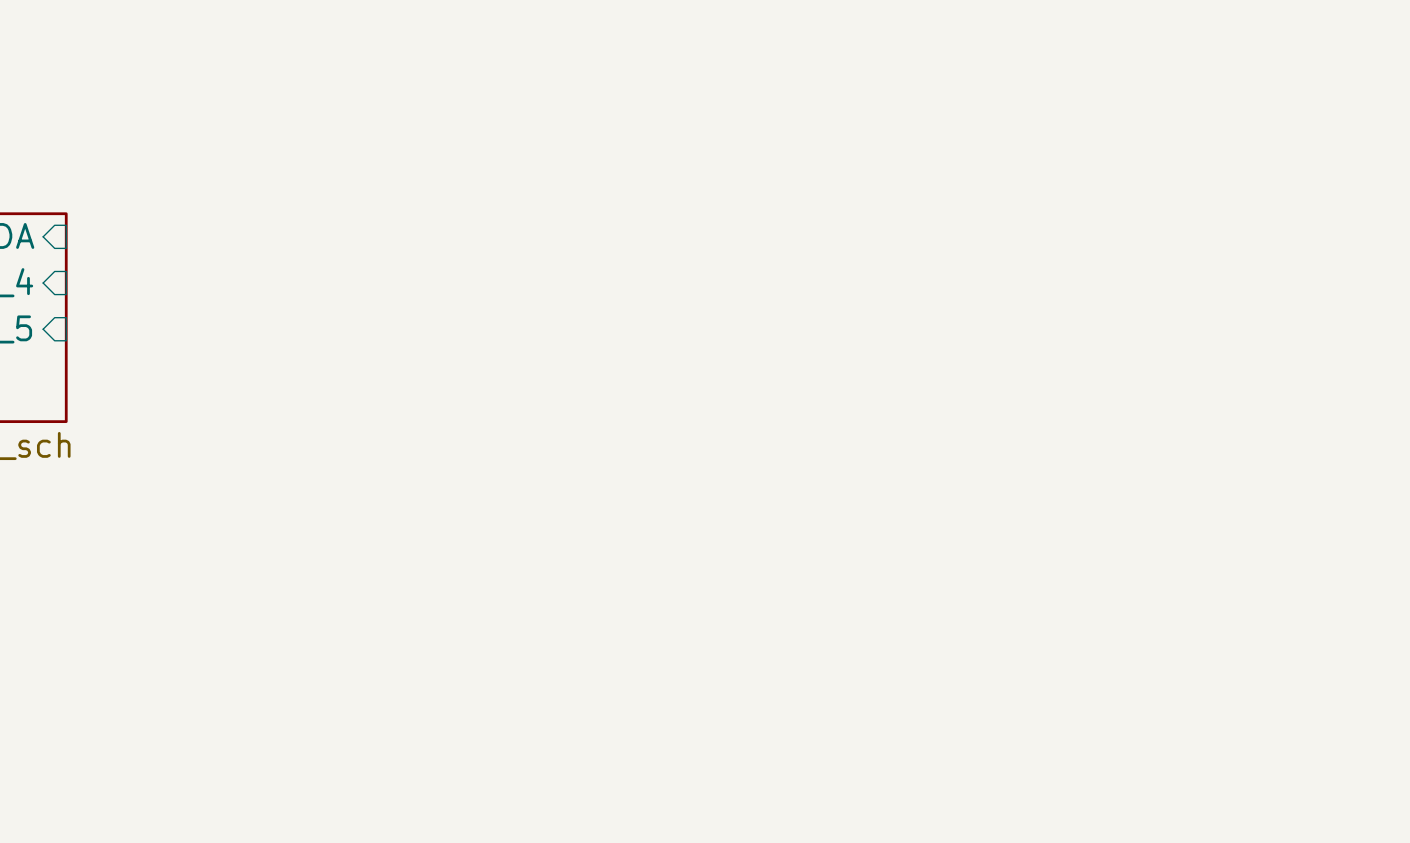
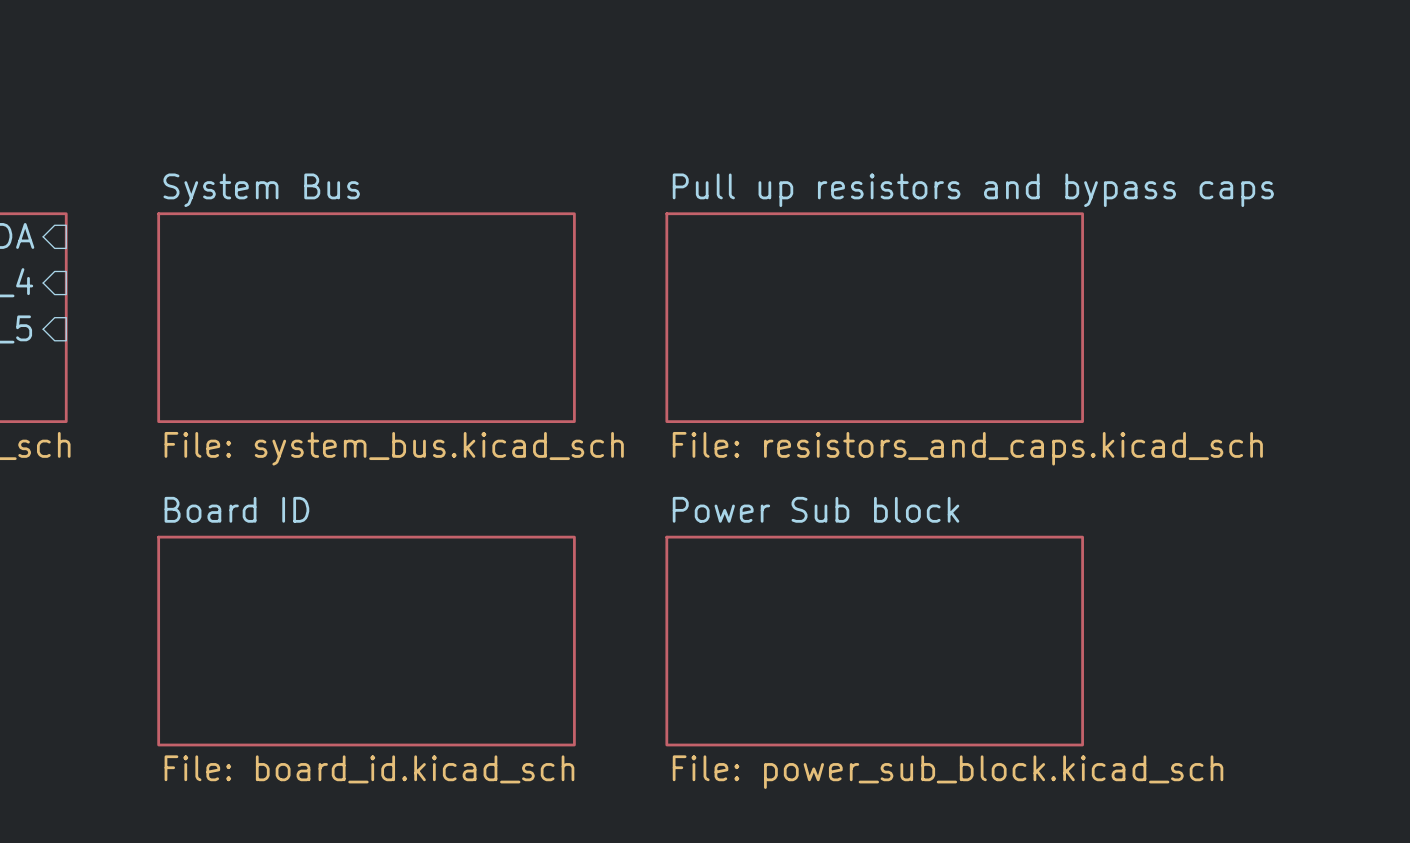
sheet System Bus: none -> File: system_bus.kicad_sch (366, 317)
sheet Pull up resistors and bypass caps: none -> File: resistors_and_caps.kicad_sch (874, 317)
sheet Board ID: none -> File: board_id.kicad_sch (366, 641)
sheet Power Sub block: none -> File: power_sub_block.kicad_sch (874, 641)

